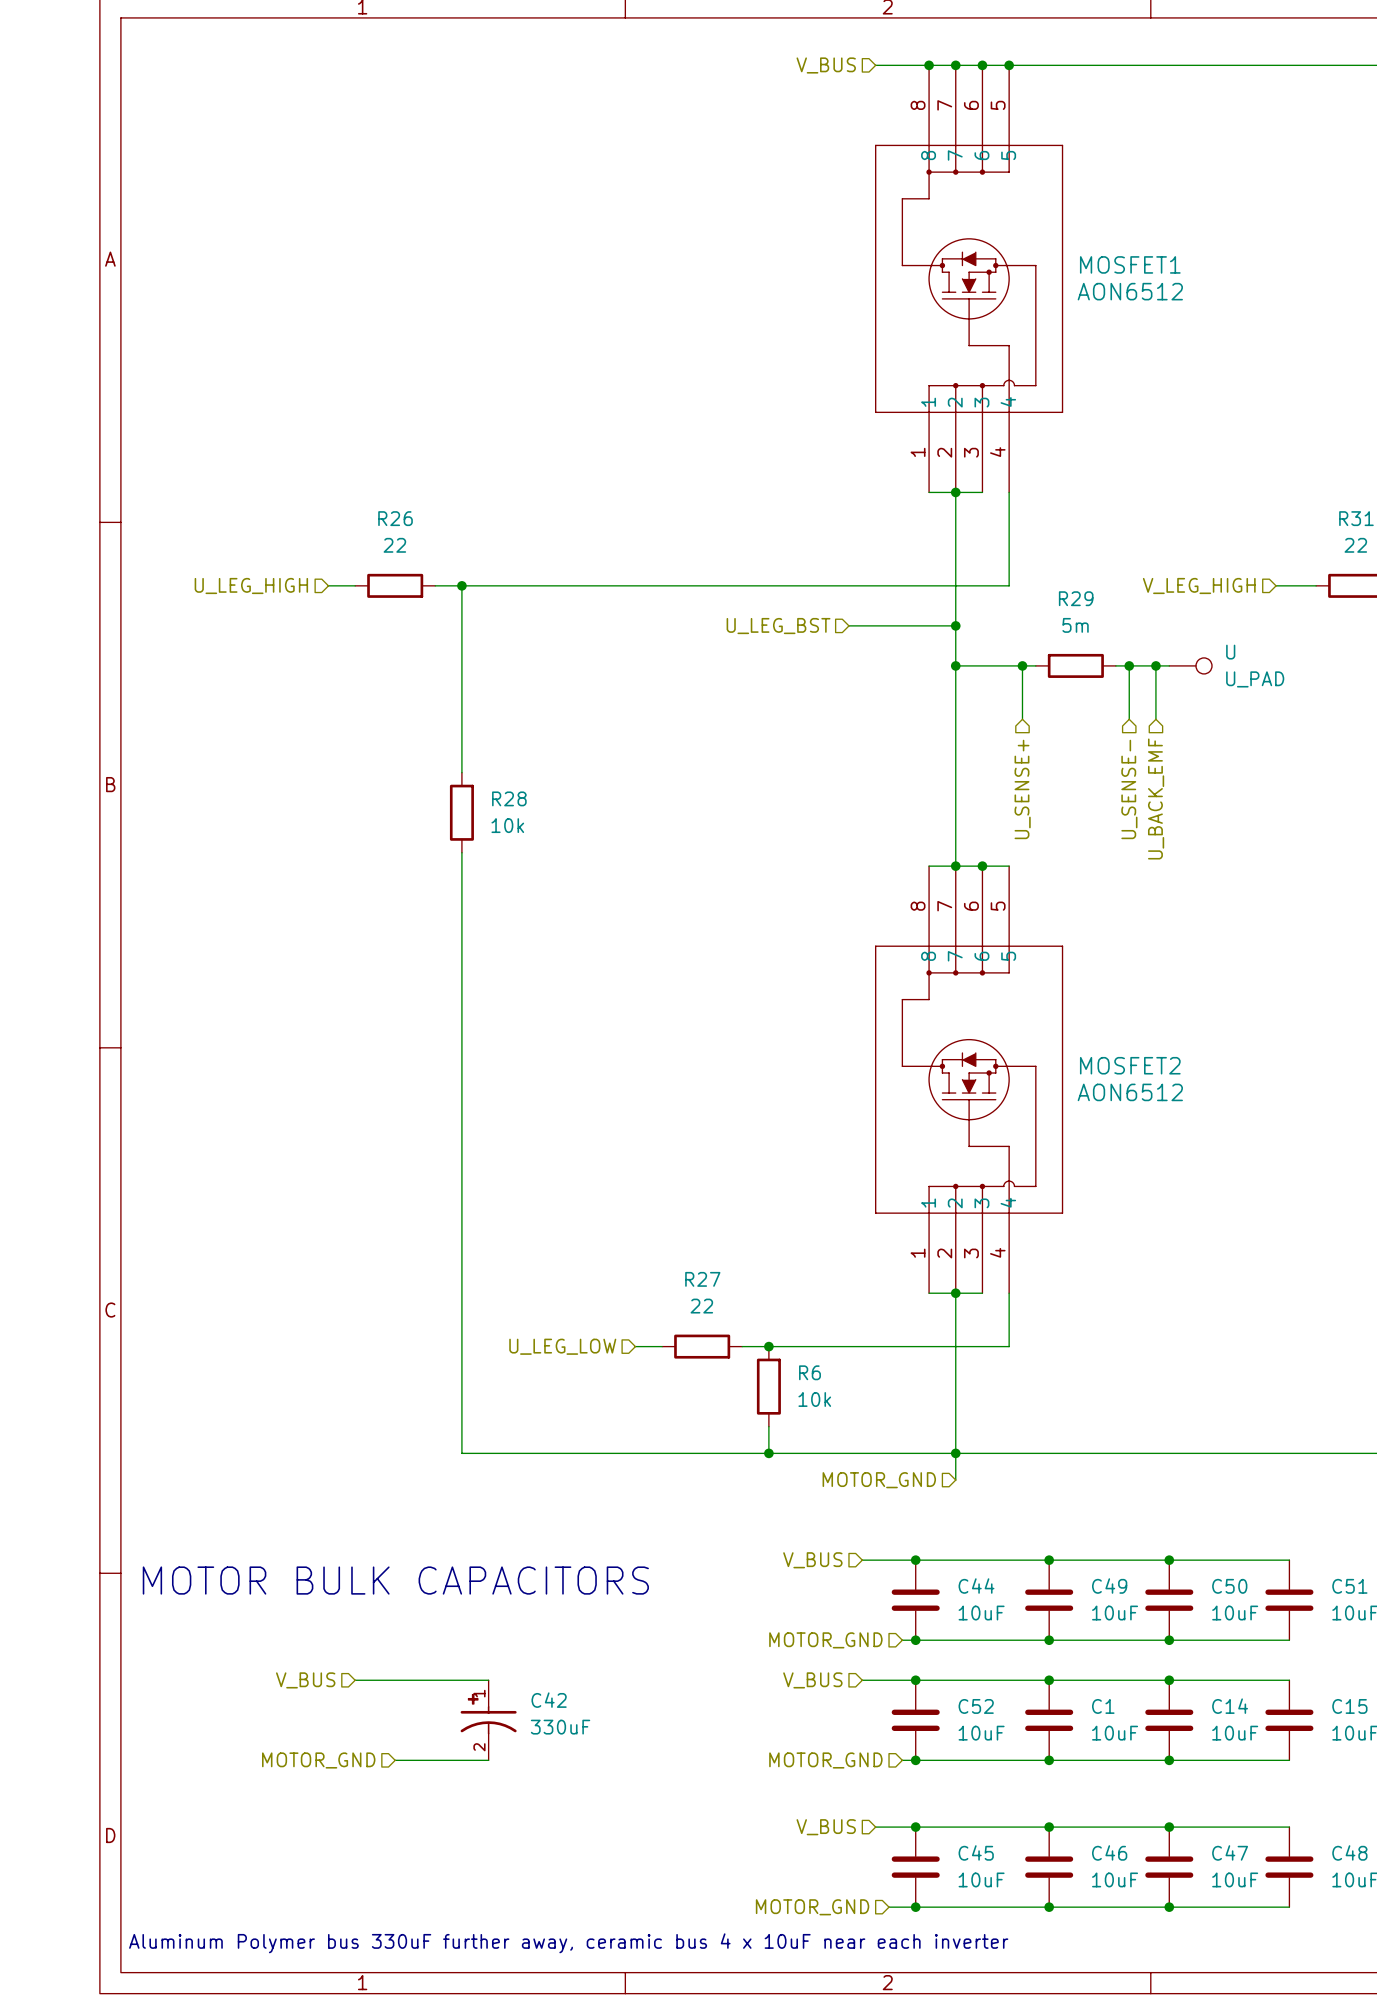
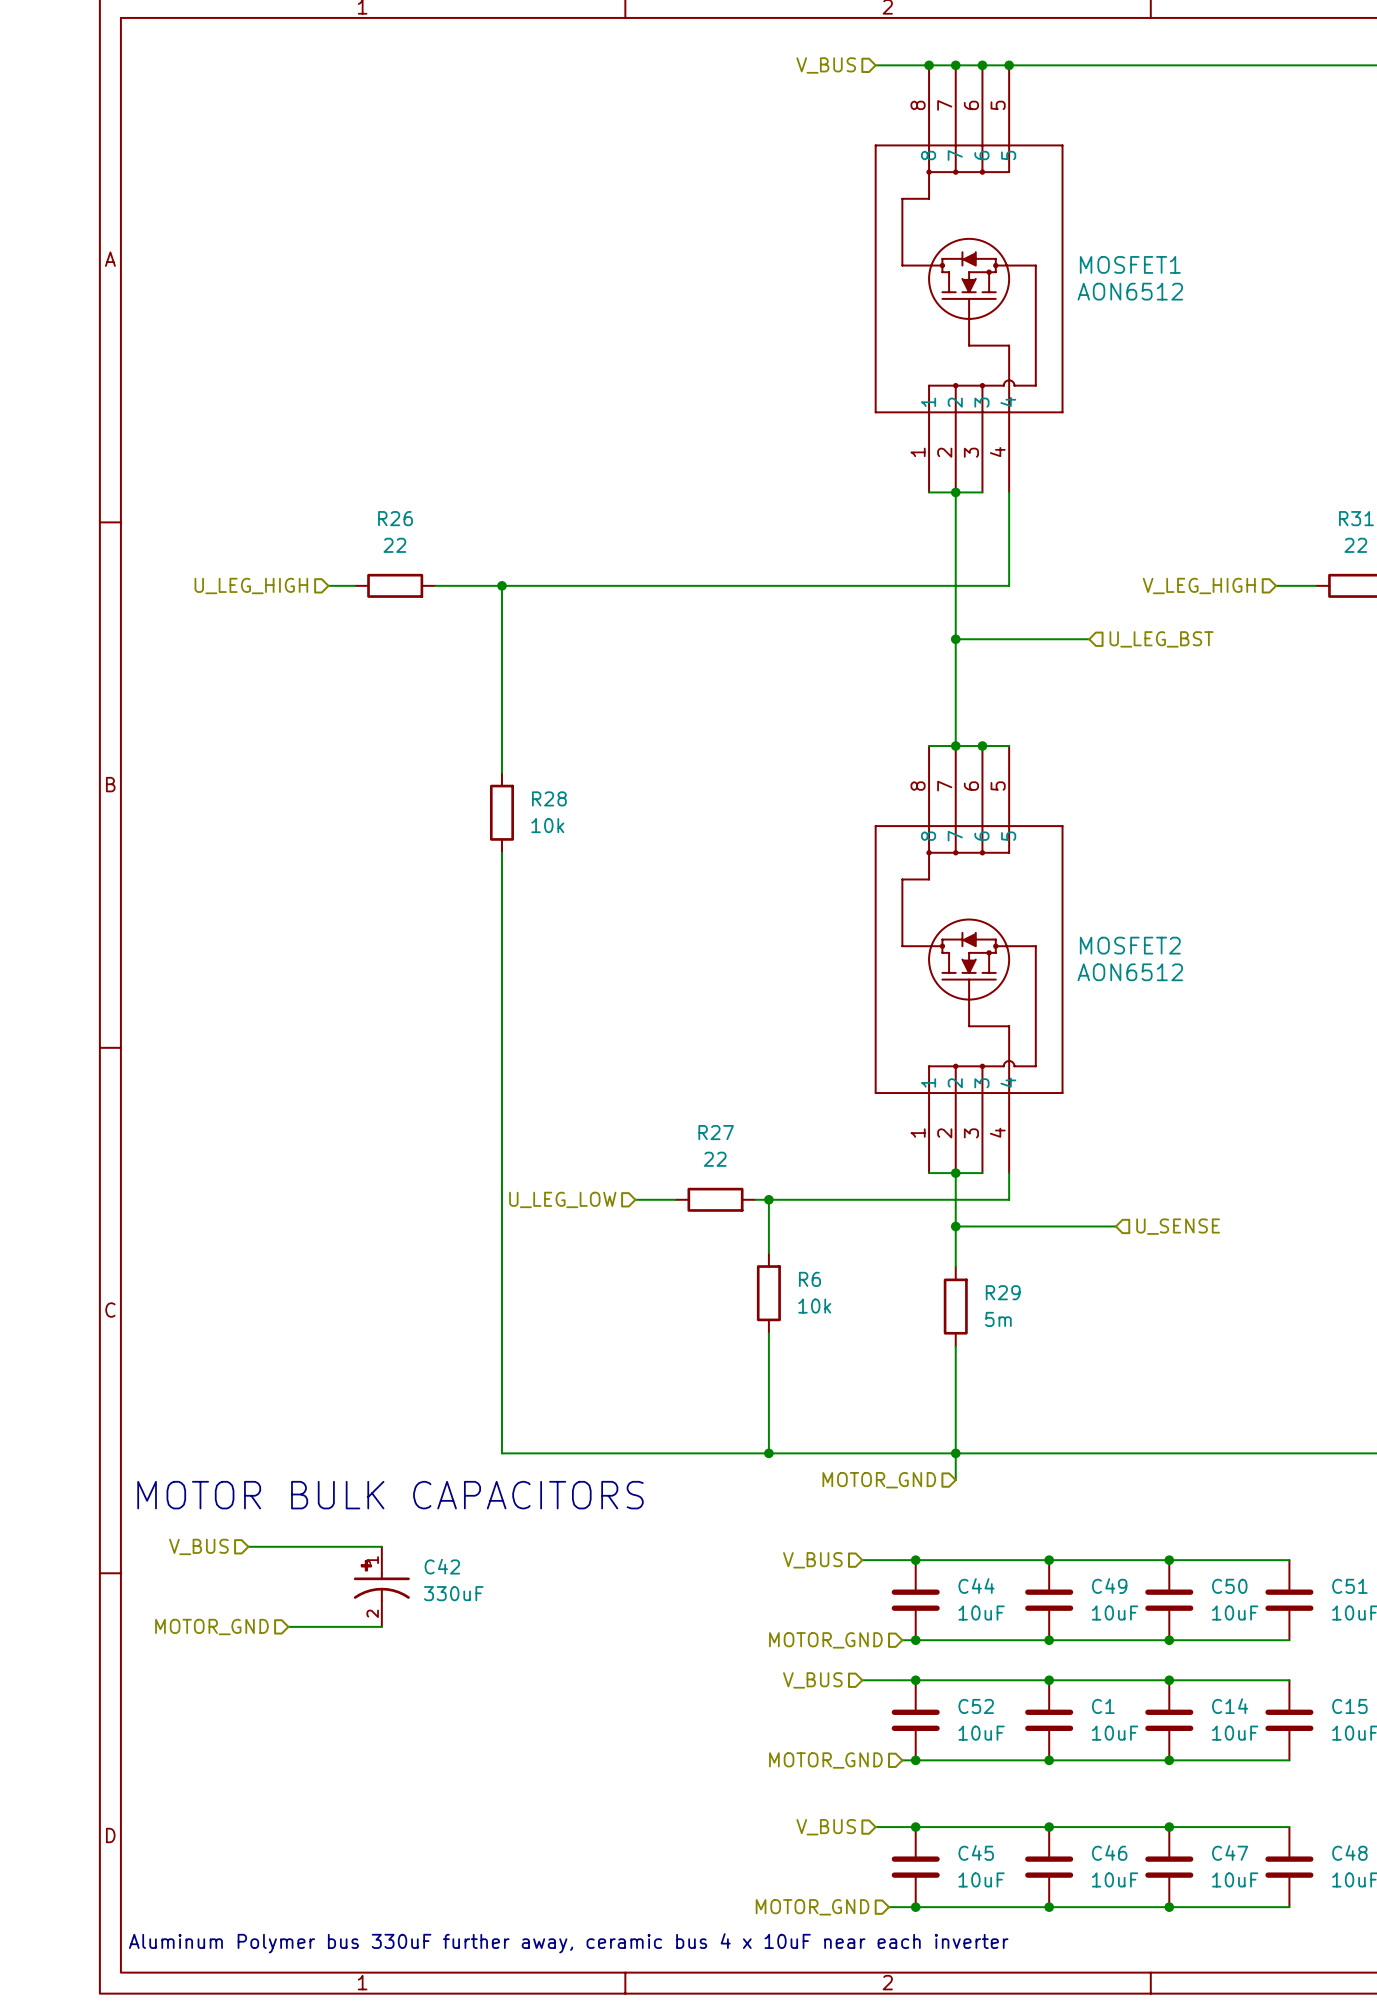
wire: (461, 585) (461, 772) -> (501, 585) (501, 772)
junction position: (461, 585) -> (501, 585)
R29 name position: R29 (1076, 598) -> R29 (1003, 1292)
wire: (848, 625) (955, 625) -> none
junction: (955, 625) -> none
hierarchical label: U_LEG_BST (778, 626) -> none
wire: none -> (955, 639) (1089, 639)
junction: none -> (955, 639)
hierarchical label: none -> U_LEG_BST (1161, 639)
wire: (955, 665) (1035, 665) -> none
junction: (955, 665) -> none
wire: (1022, 665) (1022, 719) -> none
junction: (1022, 665) -> none
R29 rotation: 0° (1075, 665) -> 90° clockwise (955, 1306)
R29 position: (1075, 665) -> (955, 1306)
wire: (1115, 665) (1169, 665) -> none
wire: (1129, 665) (1129, 719) -> none
junction: (1129, 665) -> none
wire: (1155, 665) (1155, 719) -> none
junction: (1155, 665) -> none
U: U_PAD (1190, 665) -> none
junction: none -> (955, 746)
junction: none -> (982, 746)
hierarchical label: U_SENSE+ (1022, 789) -> none
hierarchical label: U_SENSE- (1129, 789) -> none
hierarchical label: U_BACK_EMF (1156, 798) -> none
R28 position: (461, 812) -> (501, 812)
wire: (461, 852) (461, 1453) (501, 1453) -> (501, 852) (501, 1453)
wire: (929, 866) (1009, 866) -> (929, 746) (1009, 746)
junction: (955, 866) -> none
junction: (982, 866) -> none
MOSFET2 position: (969, 1079) -> (969, 959)
junction: none -> (955, 1173)
wire: none -> (1009, 1173) (1009, 1199) (755, 1199)
wire: none -> (635, 1199) (675, 1199)
junction: none -> (768, 1199)
wire: none -> (955, 1226) (1115, 1226)
junction: none -> (955, 1226)
hierarchical label: none -> U_SENSE (1178, 1226)
wire: (929, 1293) (982, 1293) -> (929, 1173) (982, 1173)
wire: (955, 1293) (955, 1346) -> (768, 1199) (768, 1253)
junction: (955, 1293) -> none
wire: (1009, 1293) (1009, 1346) (742, 1346) -> none
wire: none -> (768, 1333) (768, 1426)
hierarchical label position: U_LEG_LOW (562, 1346) -> U_LEG_LOW (562, 1199)
wire: (635, 1346) (662, 1346) -> none
R27 position: (702, 1346) -> (715, 1199)
junction: (768, 1346) -> none
R6 position: (768, 1386) -> (768, 1293)
text position: MOTOR BULK CAPACITORS (395, 1580) -> MOTOR BULK CAPACITORS (390, 1495)
hierarchical label position: V_BUS (305, 1680) -> V_BUS (198, 1546)
wire: (355, 1680) (488, 1680) -> (248, 1546) (381, 1546)
C42 position: (488, 1720) -> (381, 1586)
hierarchical label position: MOTOR_GND (318, 1760) -> MOTOR_GND (211, 1627)
wire: (395, 1760) (488, 1760) -> (288, 1626) (381, 1626)

